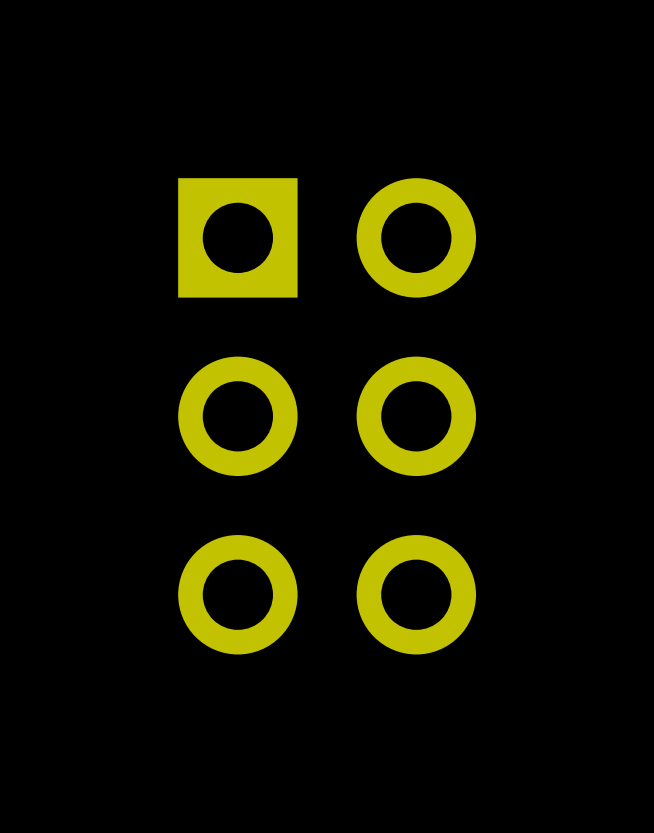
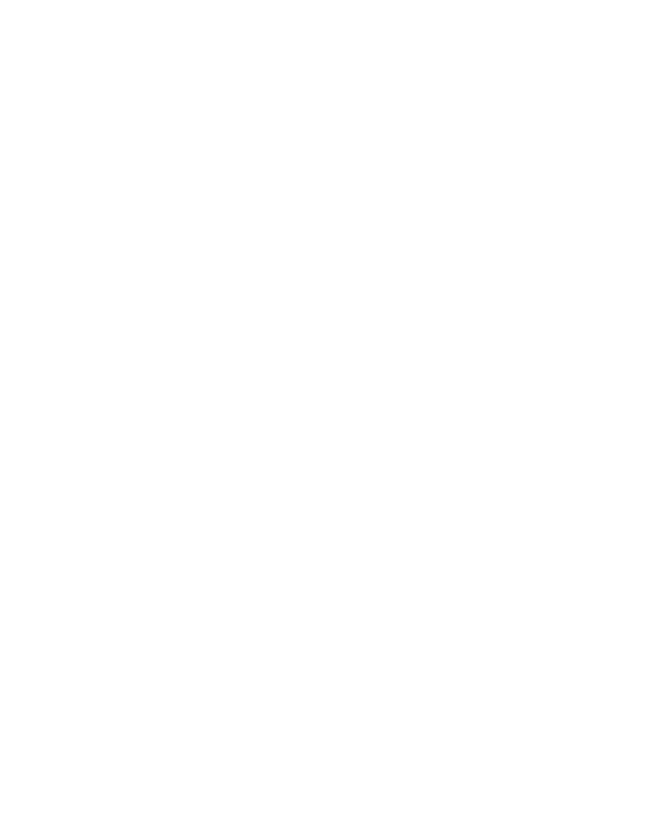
part: (327, 416) -> none

